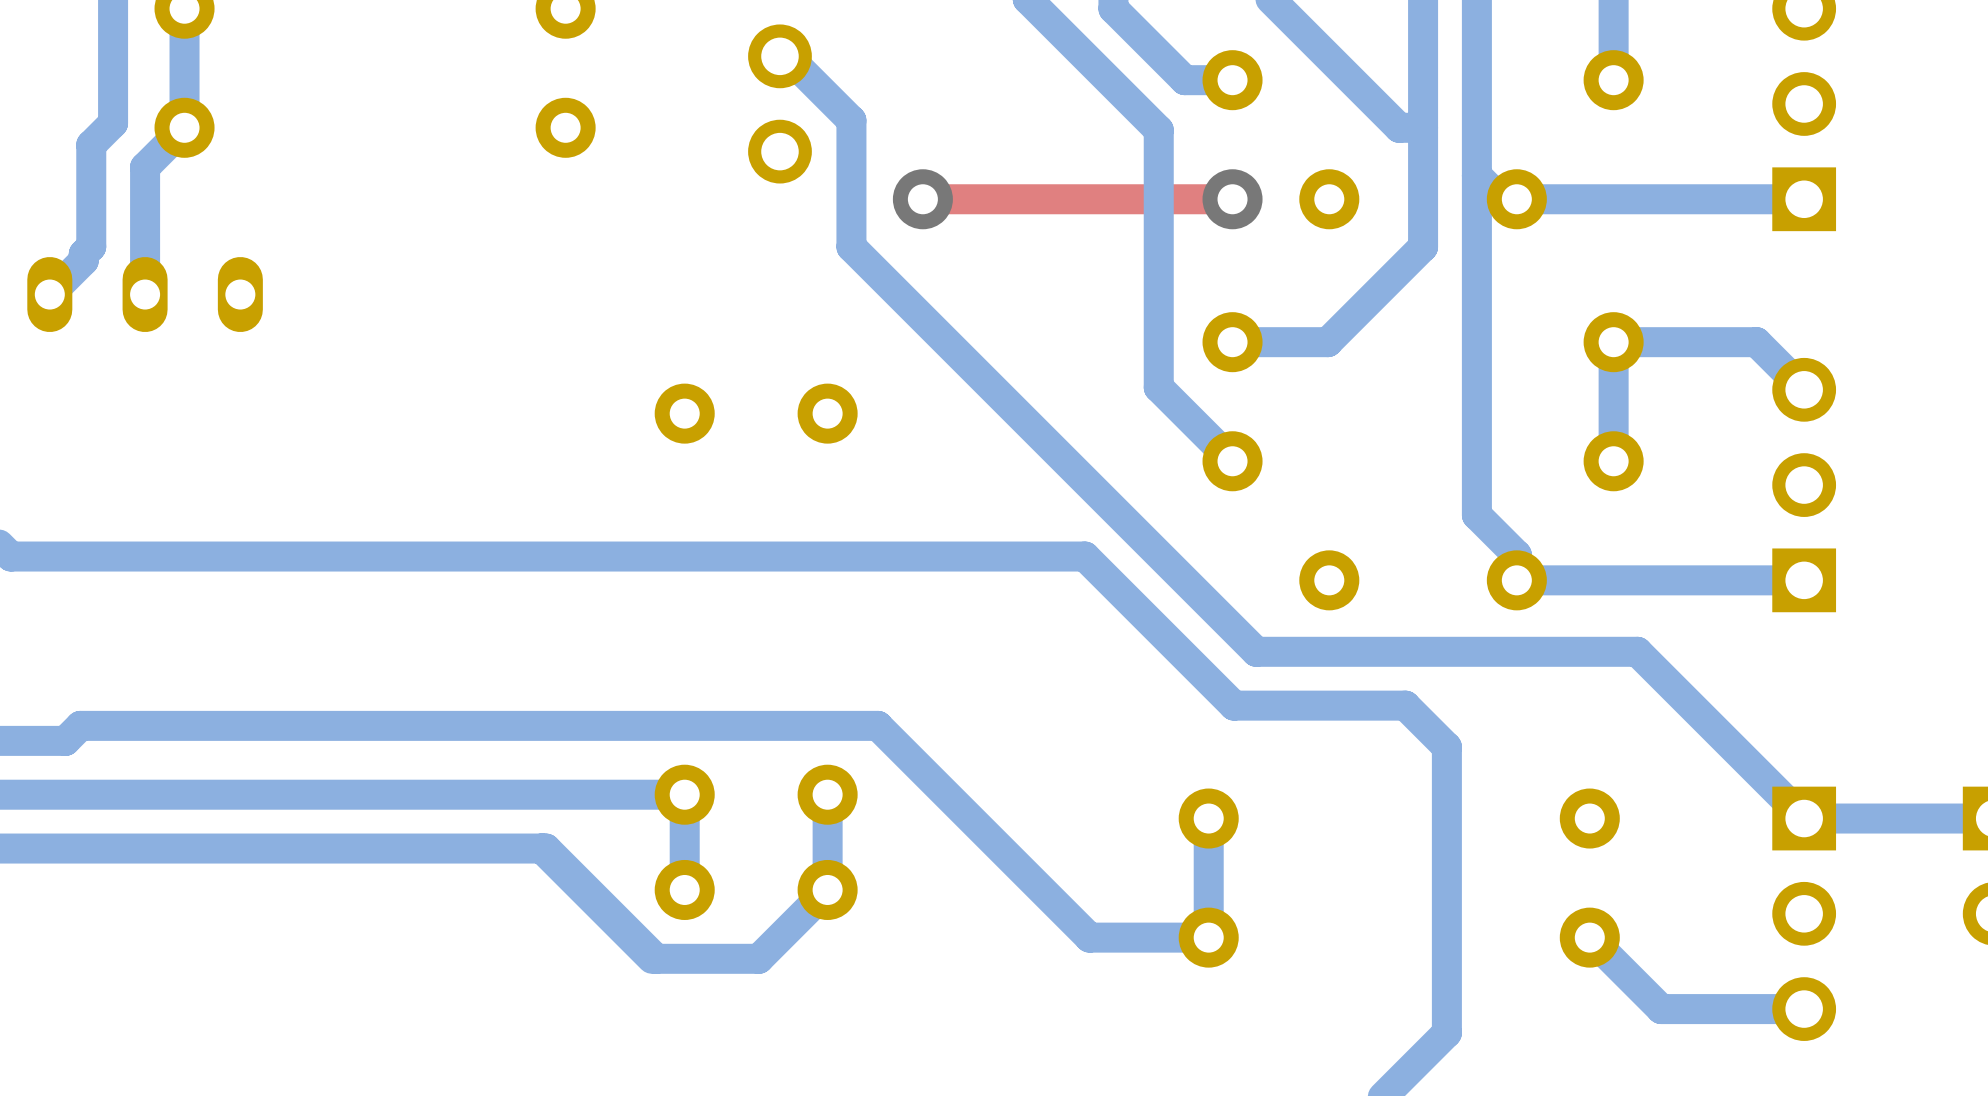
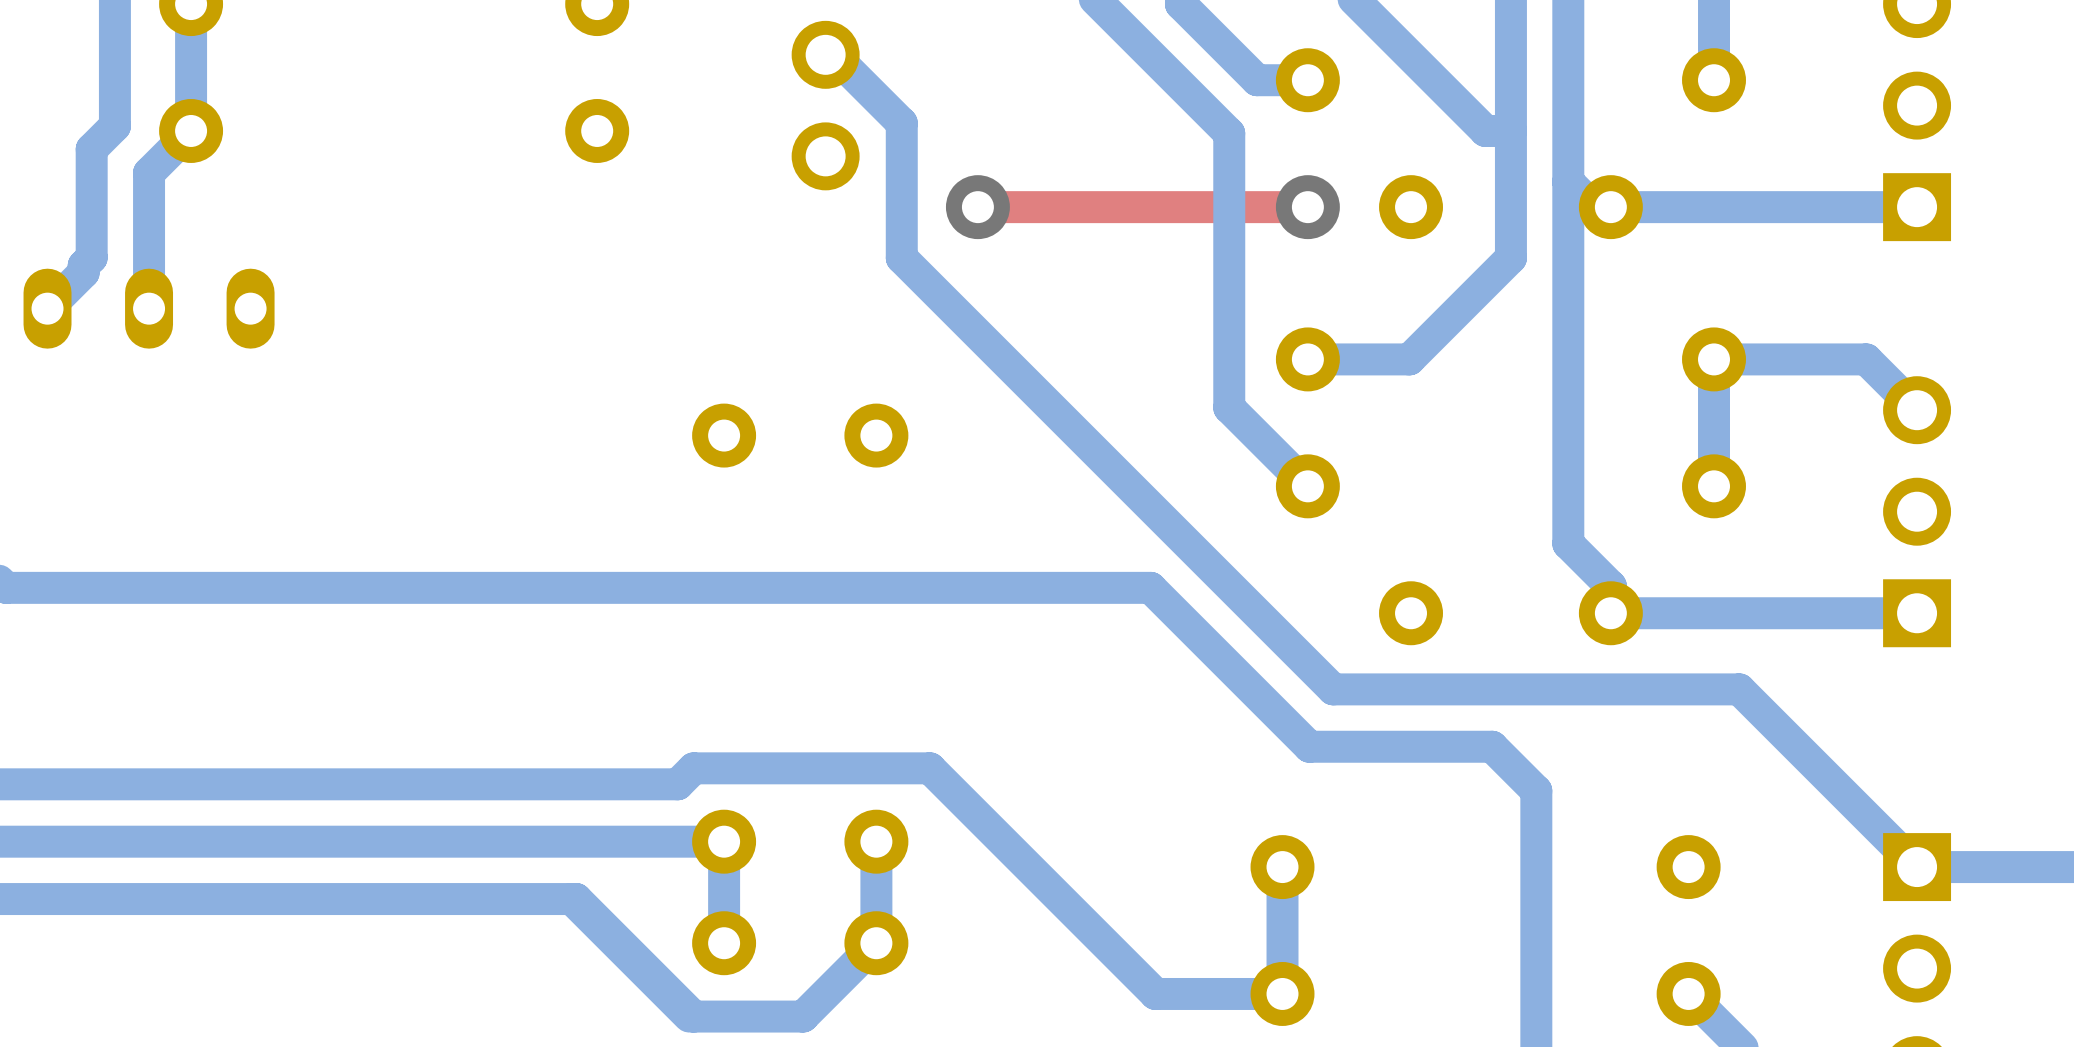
bottom track: (656, 725) (80, 725) (65, 740) -> (693, 768) (677, 784) (64, 784)

